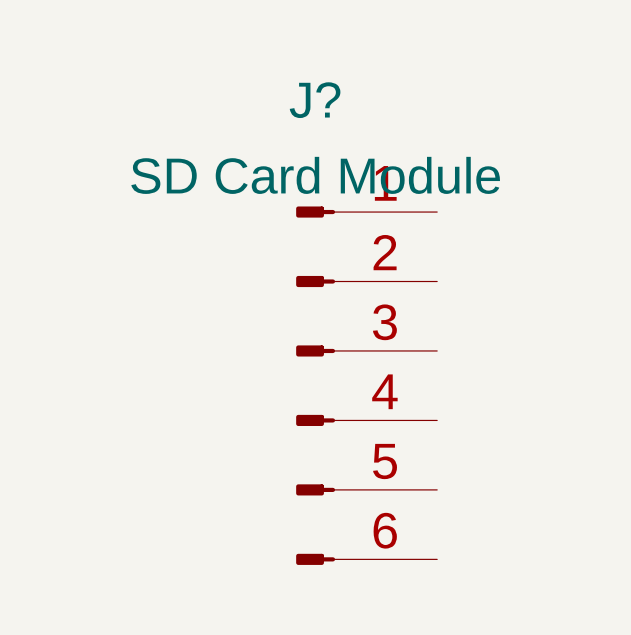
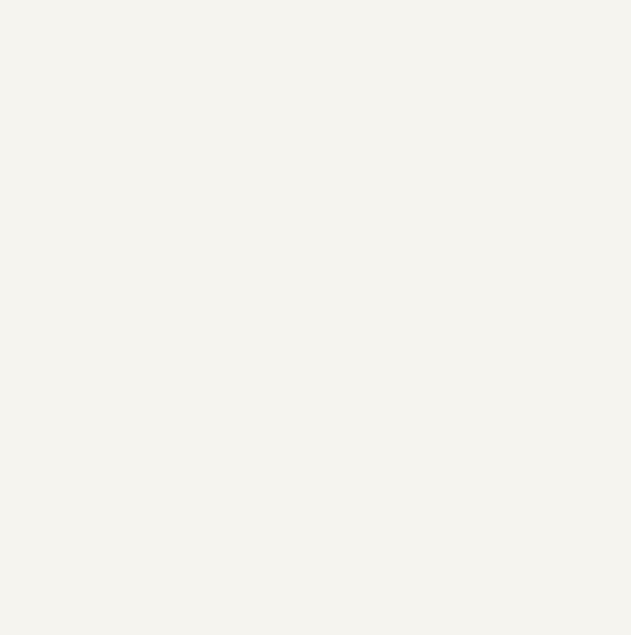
J?: SD Card Module (366, 385) -> none

